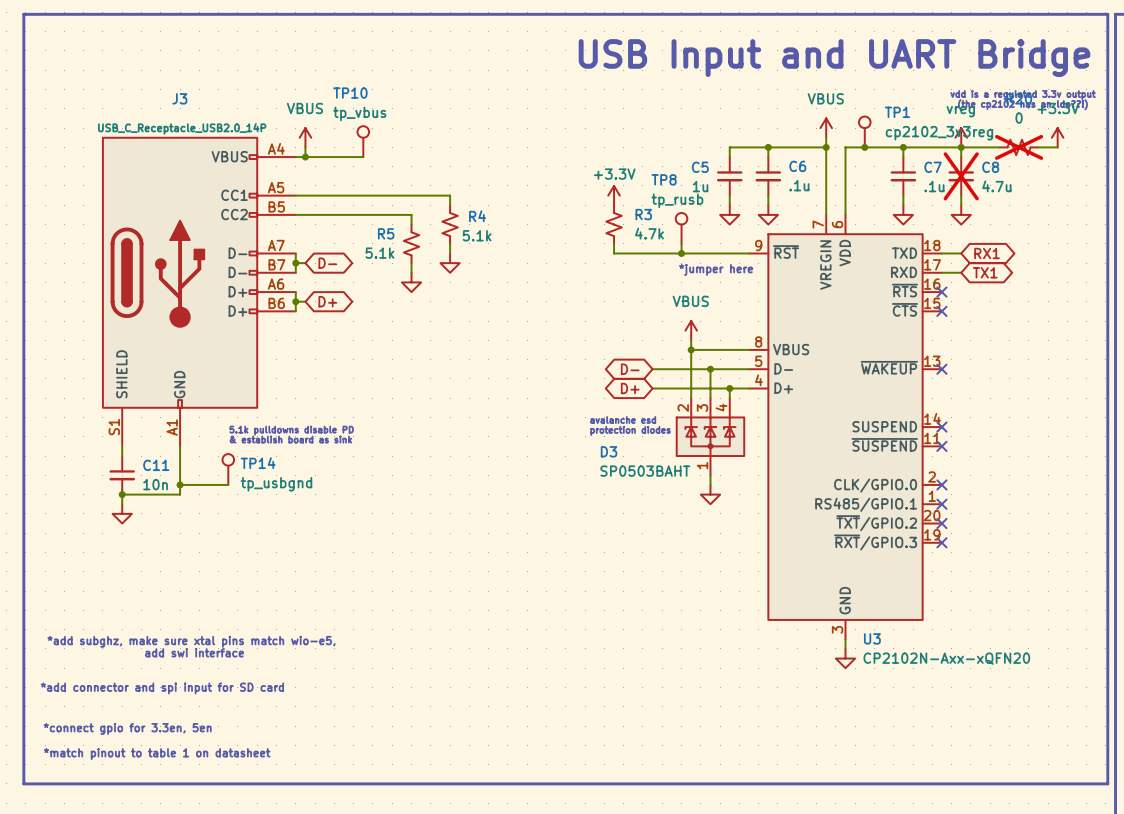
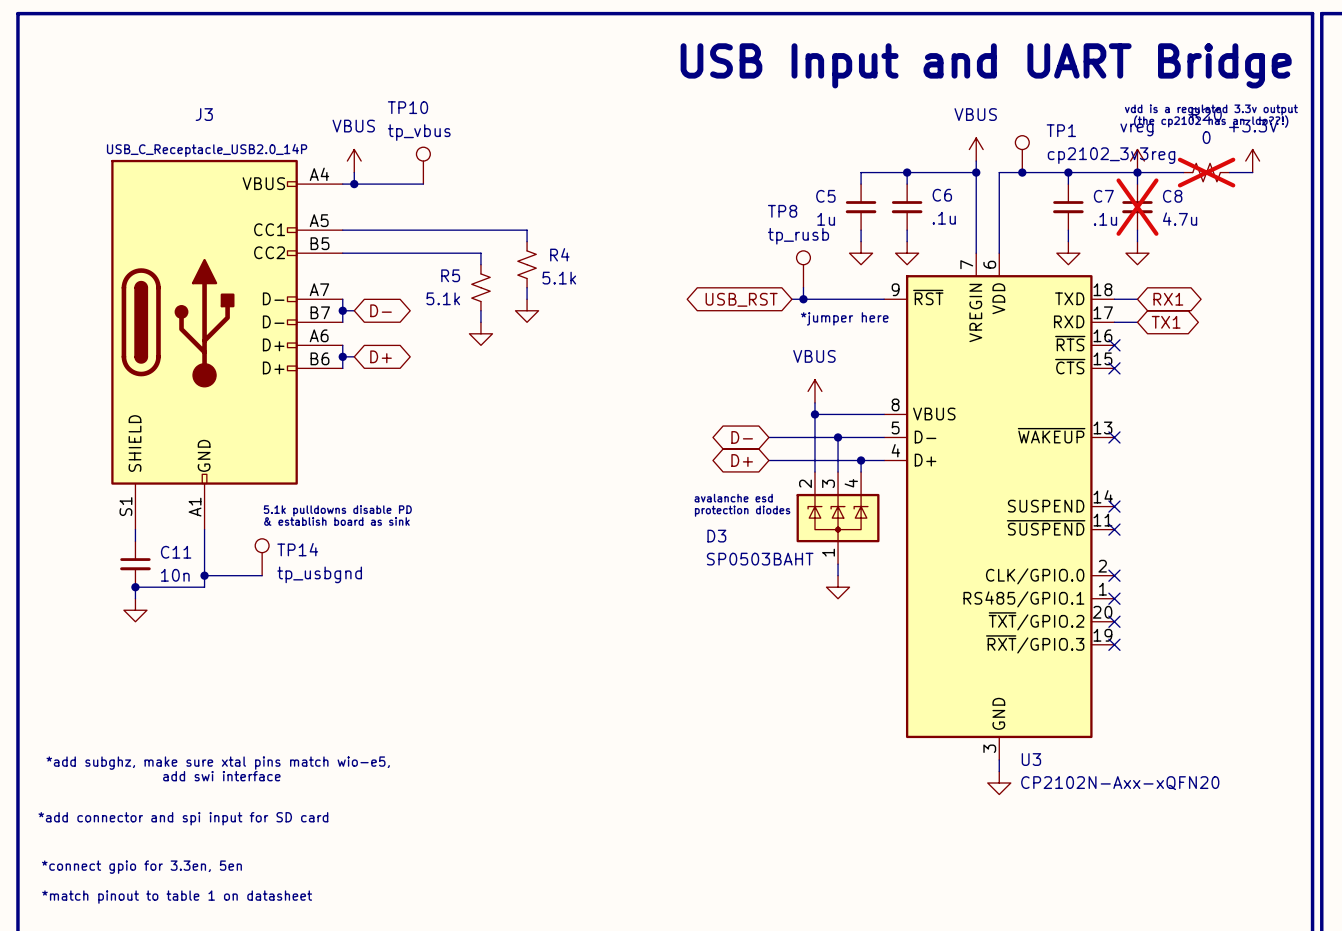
power symbol: +3.3V (614, 195) -> none
R3: 4.7k (614, 224) -> none
wire: (614, 243) (614, 253) (671, 253) -> none
global label: none -> USB_RST (741, 299)

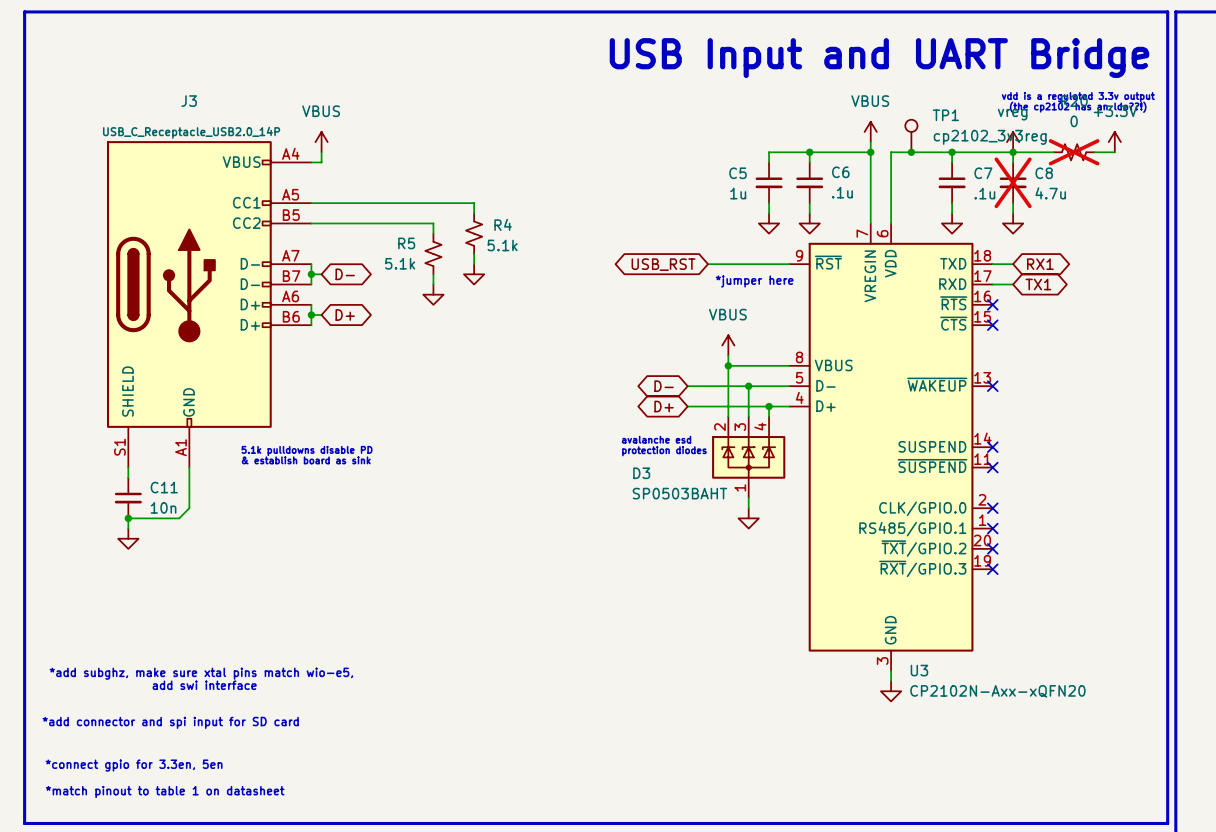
TP10: tp_vbus (423, 165) -> none
wire: (354, 184) (423, 184) -> none
junction: (354, 184) -> none
TP8: tp_rusb (803, 269) -> none
wire: (803, 287) (803, 299) -> none
junction: (803, 299) -> none
TP14: tp_usbgnd (262, 557) -> none
junction: (204, 575) -> none
wire: (262, 575) (204, 575) (204, 587) (193, 587) -> (189, 508) (179, 518)

